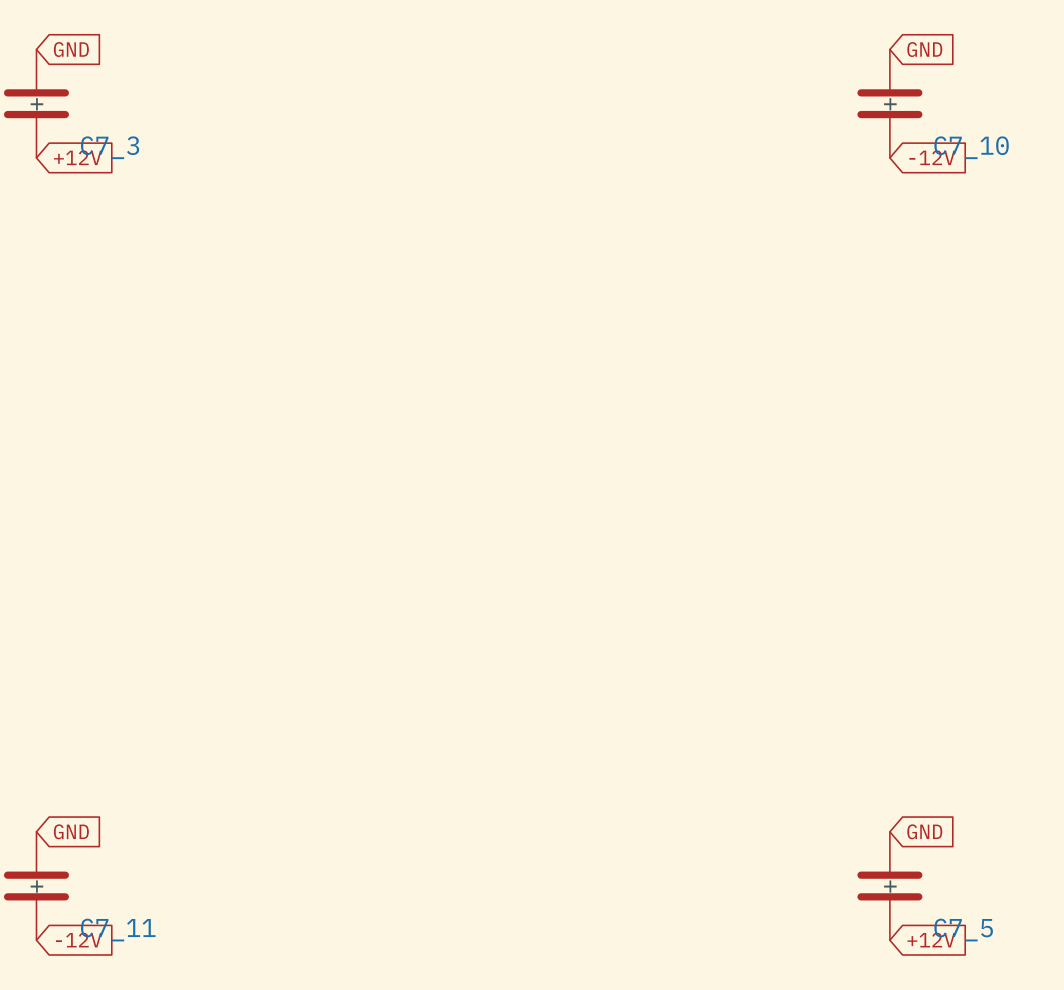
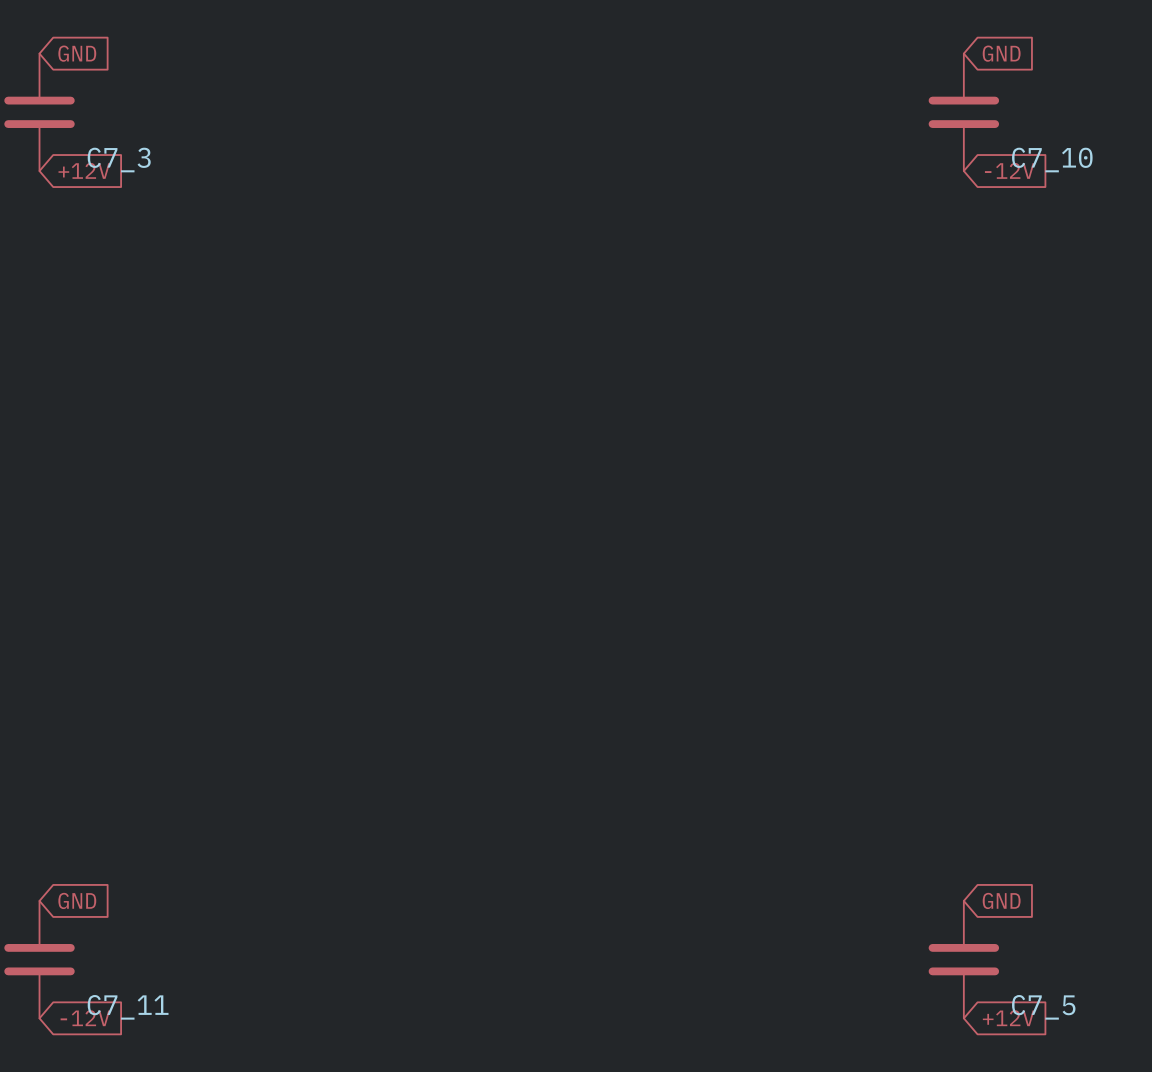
C7_3 pin name: + (36, 104) -> none
C7_10 pin name: + (890, 104) -> none
C7_11 pin name: + (36, 886) -> none
C7_5 pin name: + (890, 886) -> none

